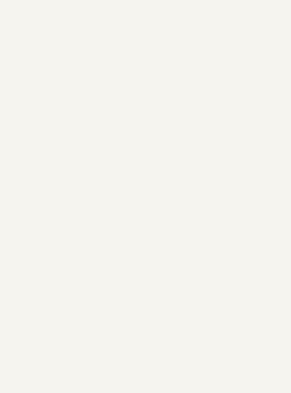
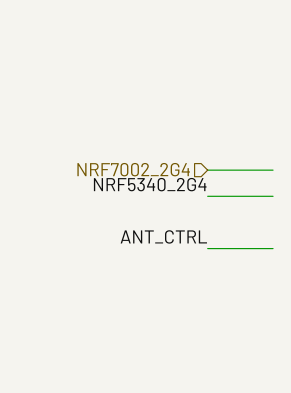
hierarchical label: none -> NRF7002_2G4 (133, 169)
wire: none -> (207, 170) (273, 170)
label: none -> NRF5340_2G4 (150, 184)
wire: none -> (207, 196) (273, 196)
label: none -> ANT_CTRL (163, 236)
wire: none -> (207, 248) (273, 248)

